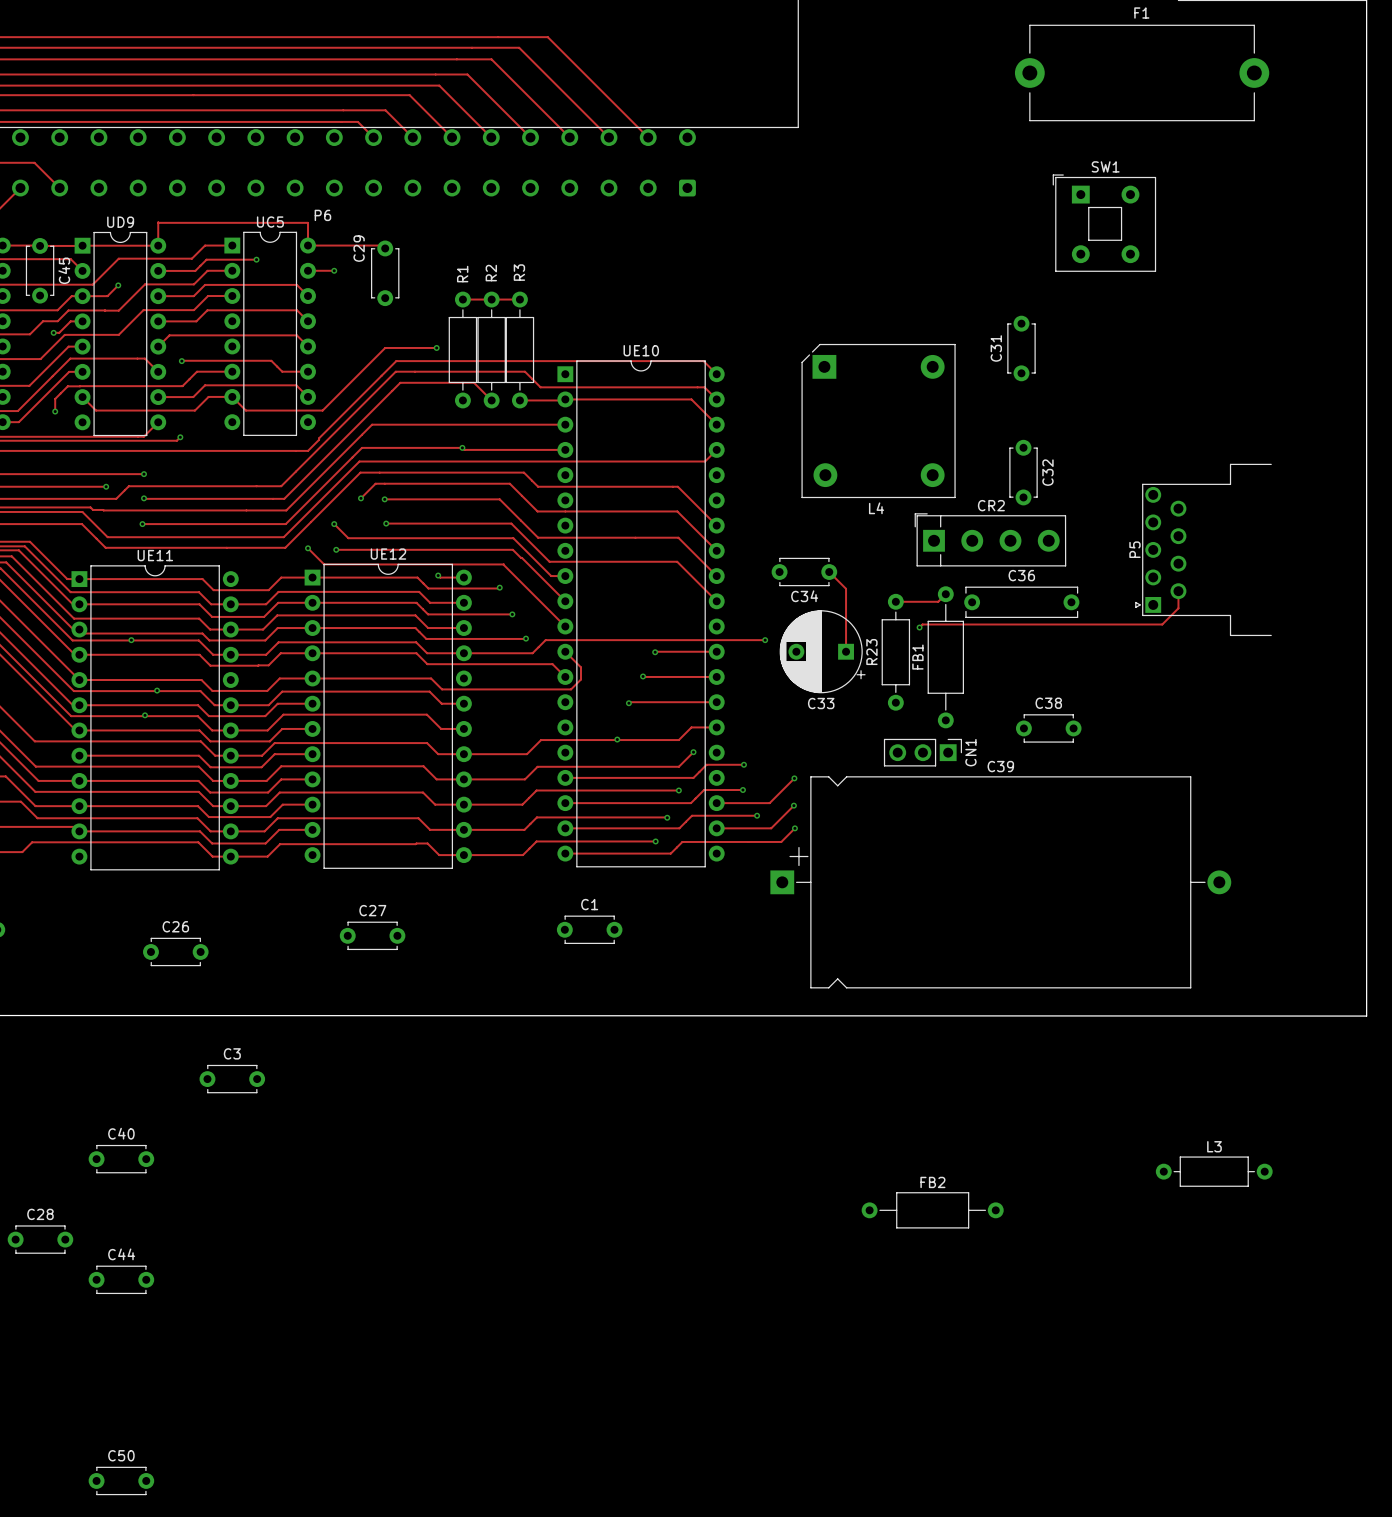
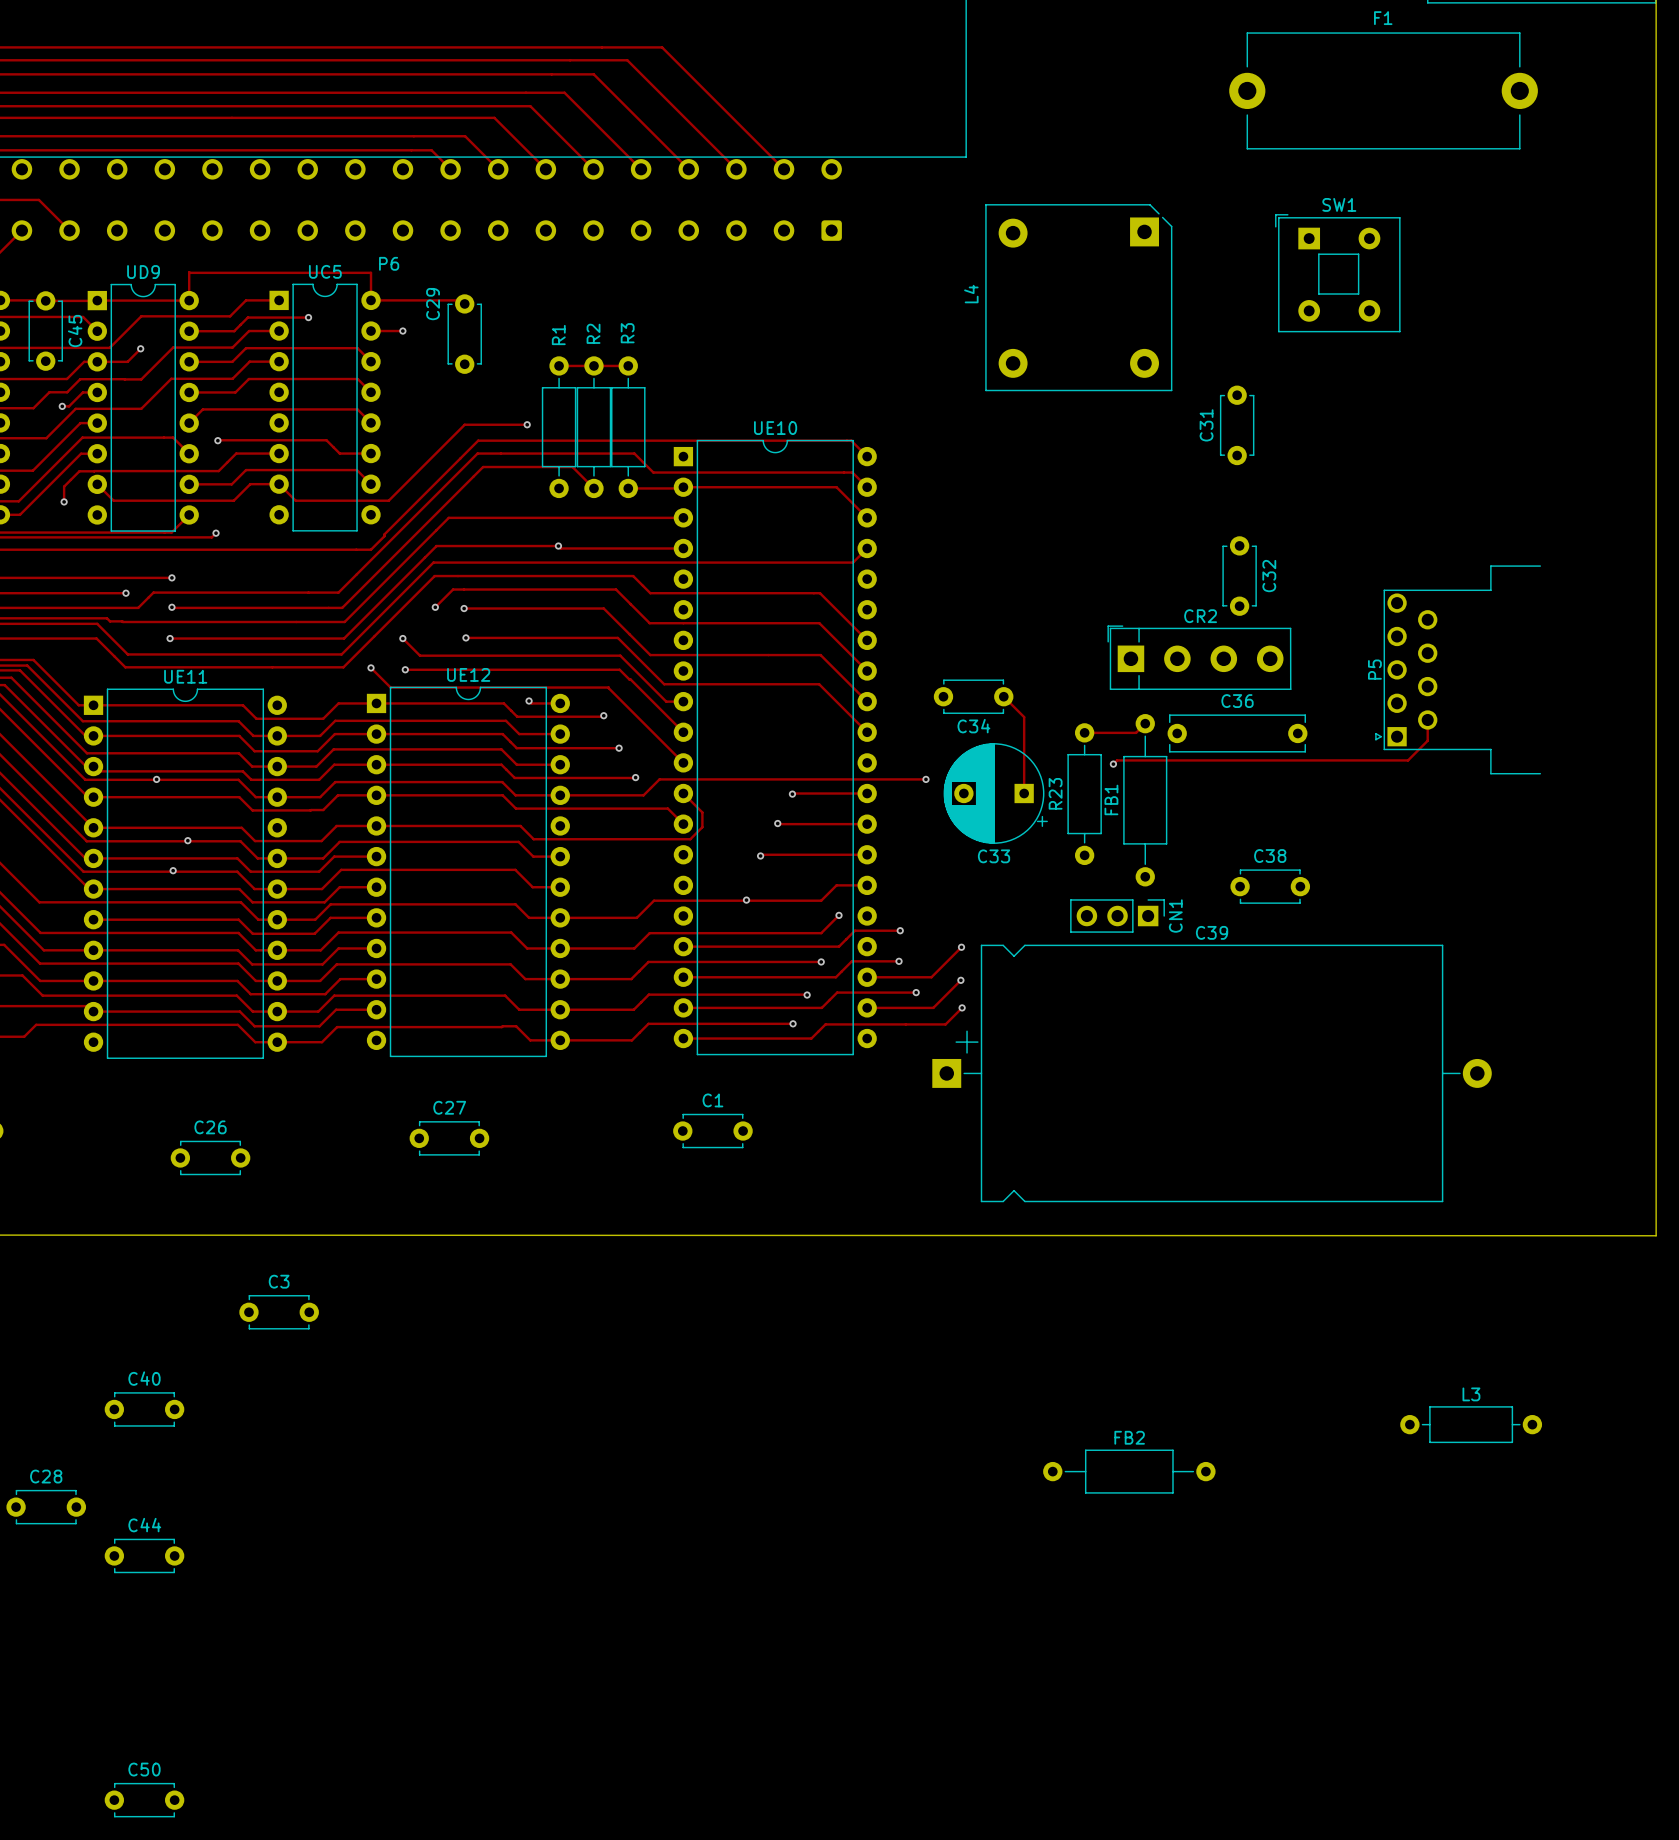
L4 rotation: 0° (878, 421) -> 90° clockwise (1078, 297)
L4 position: (878, 421) -> (1078, 297)

